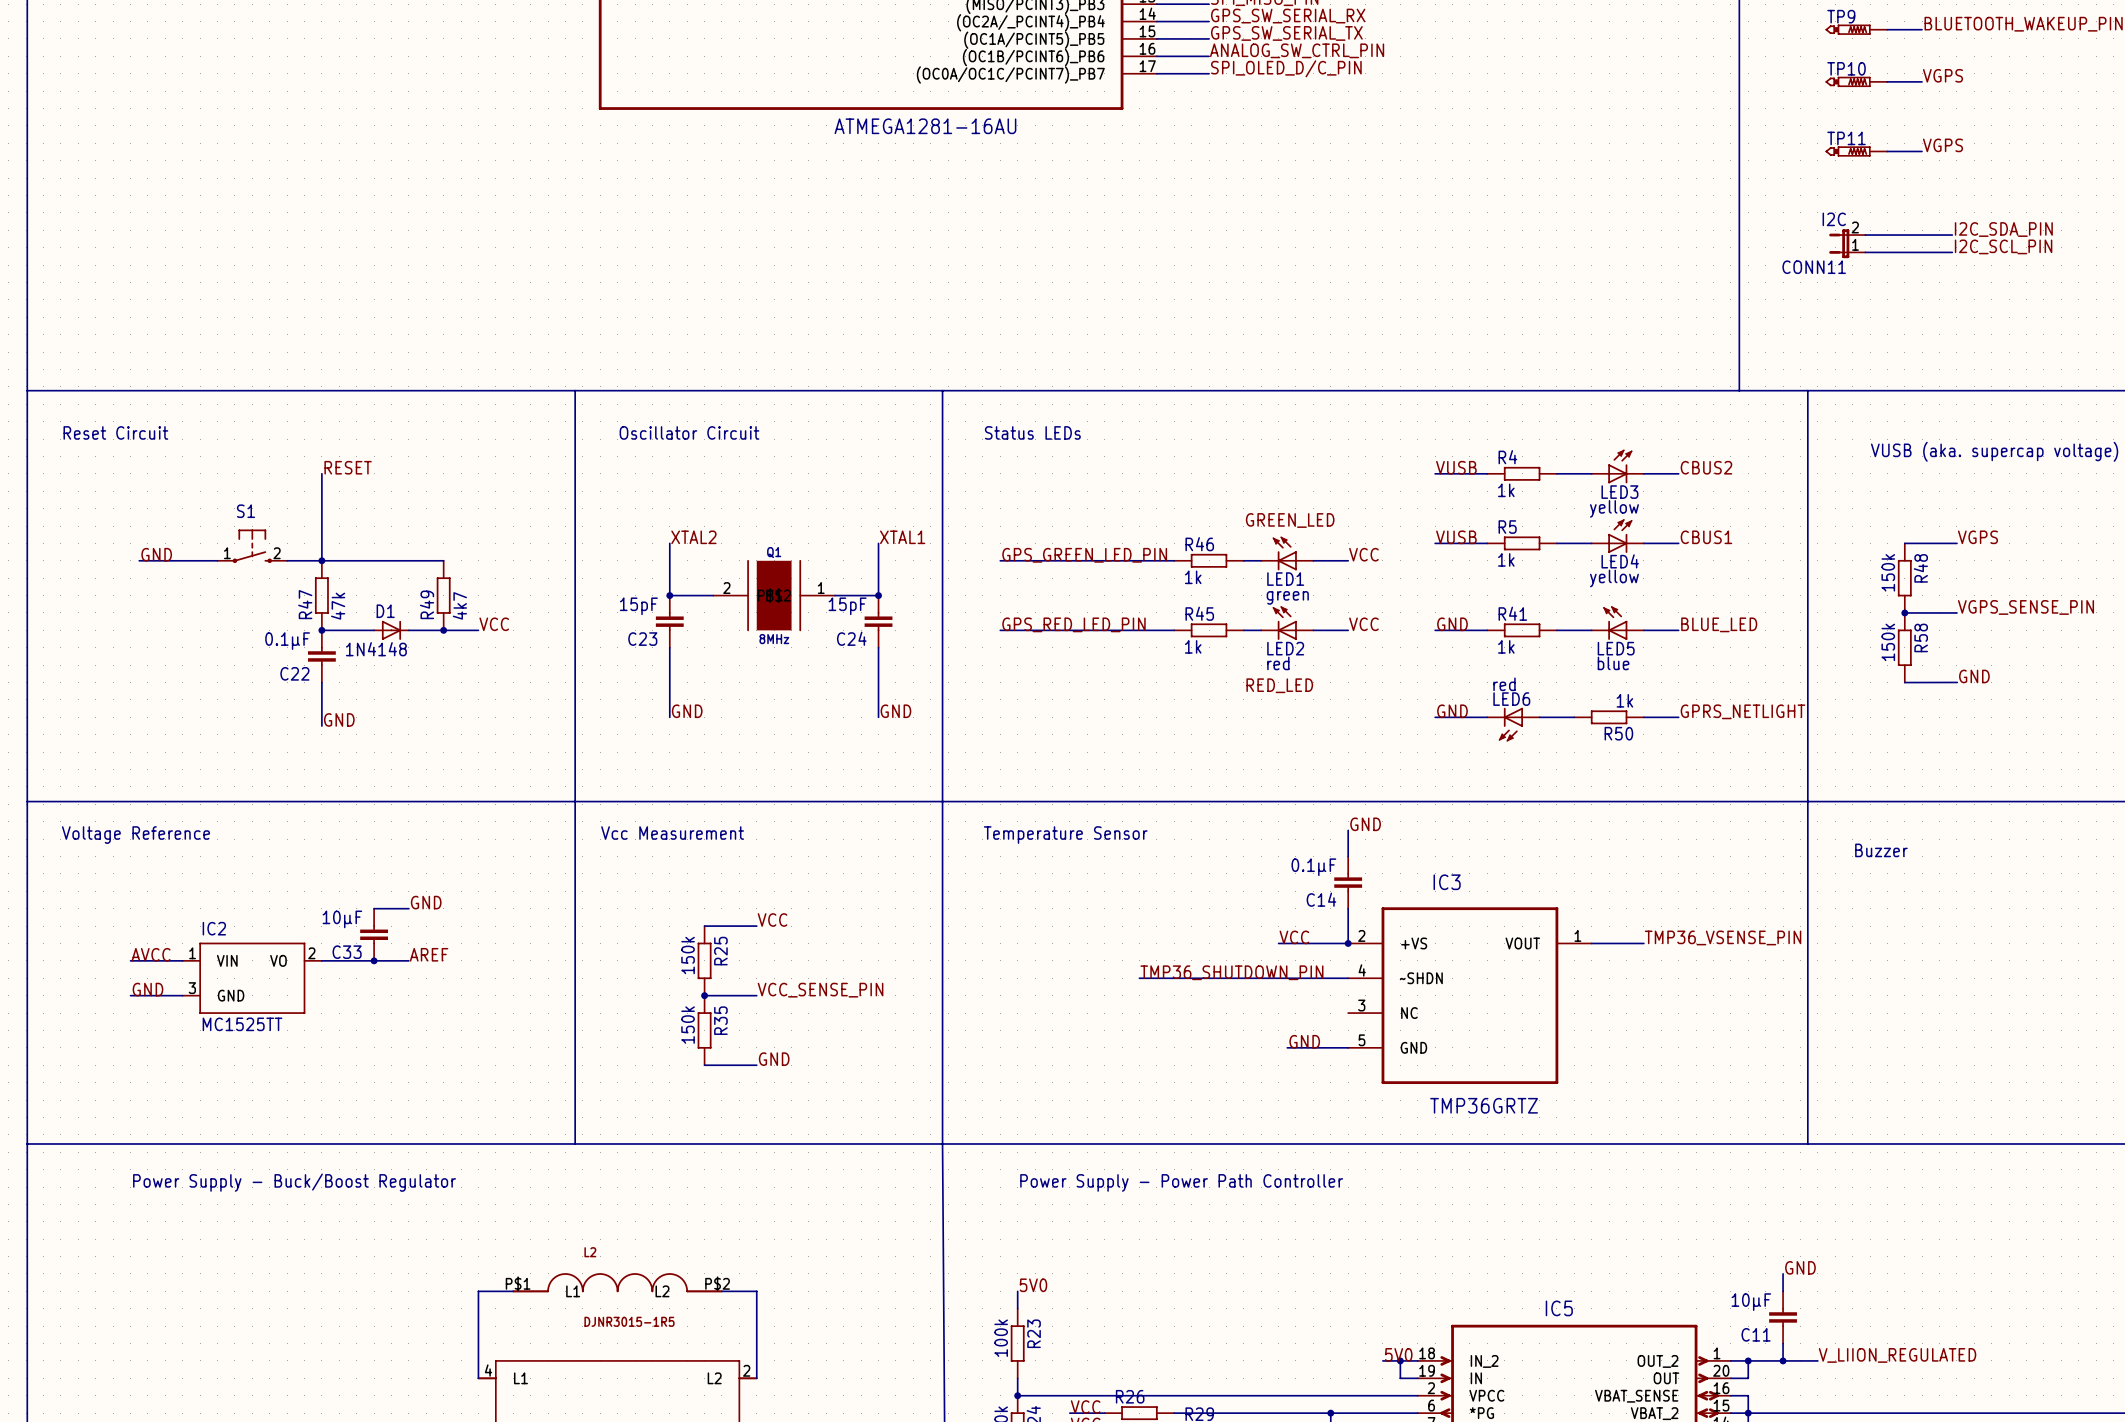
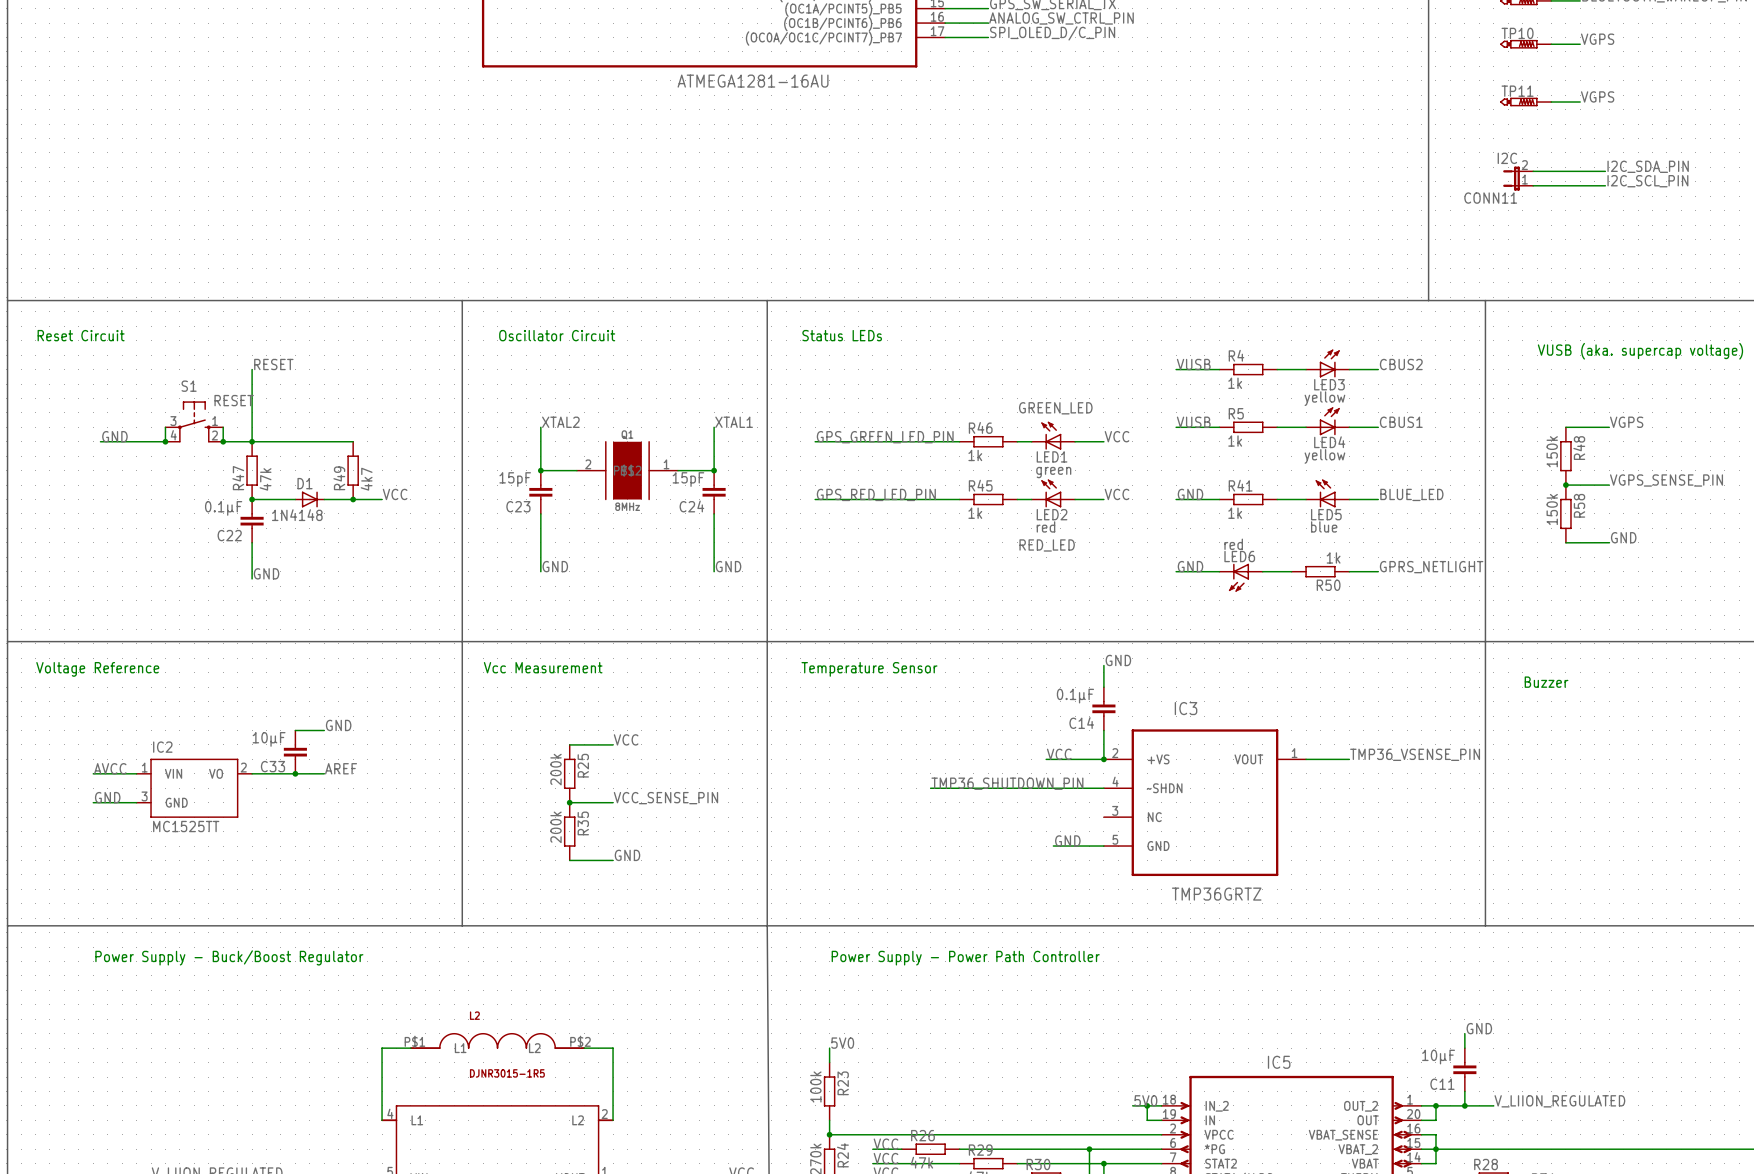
S1 value: none -> RESET (234, 400)
S1 symbol: [217, 529, 288, 564] -> [165, 401, 224, 443]
wire: none -> (165, 427) (165, 441)
wire: none -> (223, 427) (223, 441)
junction: none -> (165, 441)
junction: none -> (223, 441)
R25 value: 150k (688, 955) -> 200k (556, 769)
R35 value: 150k (688, 1025) -> 200k (556, 827)

